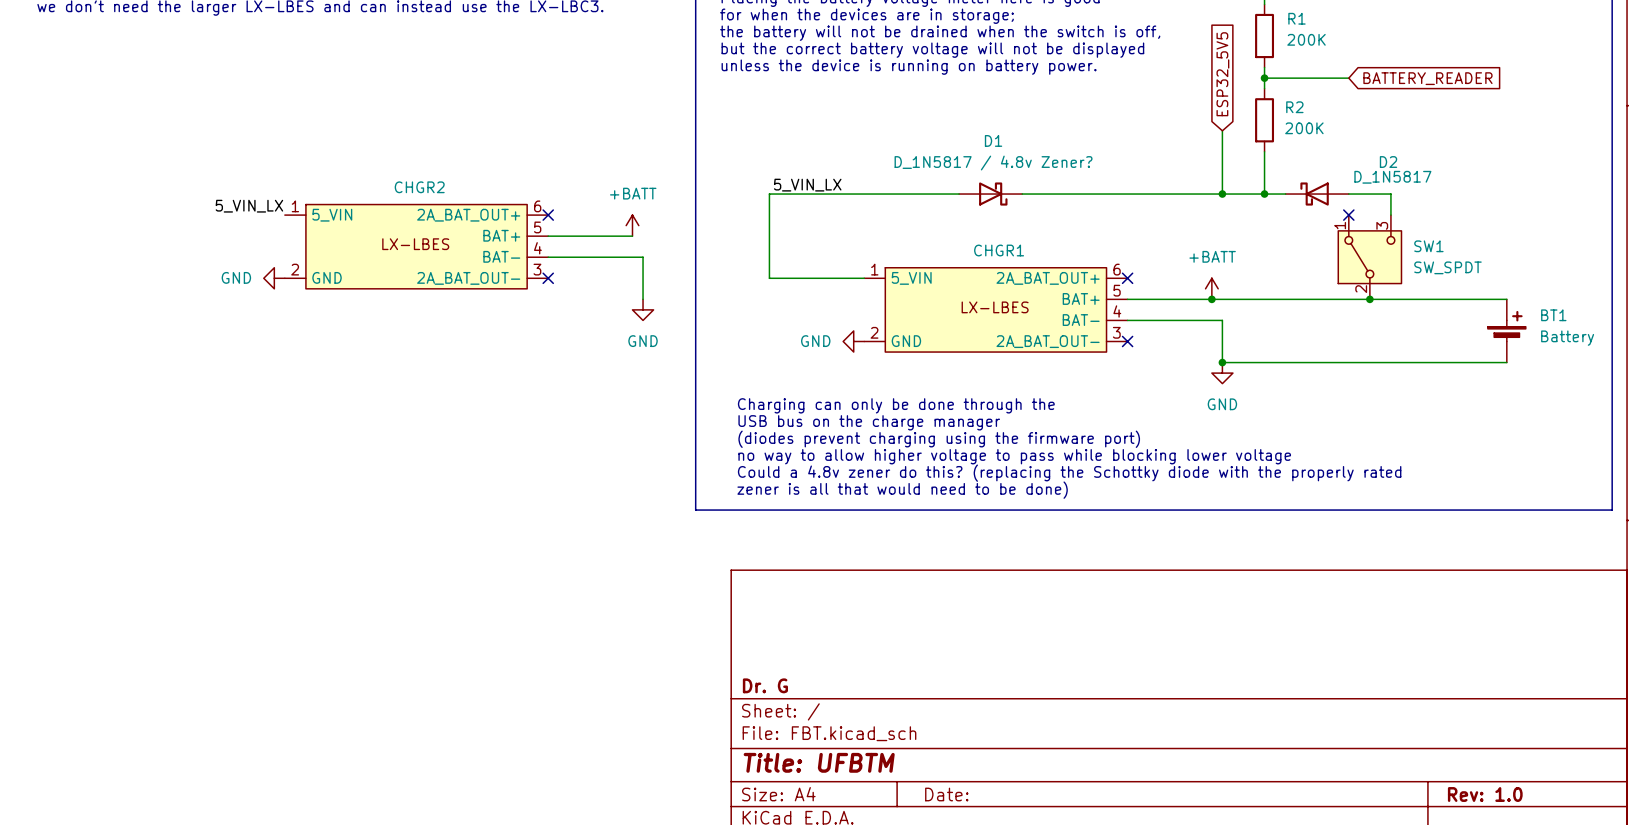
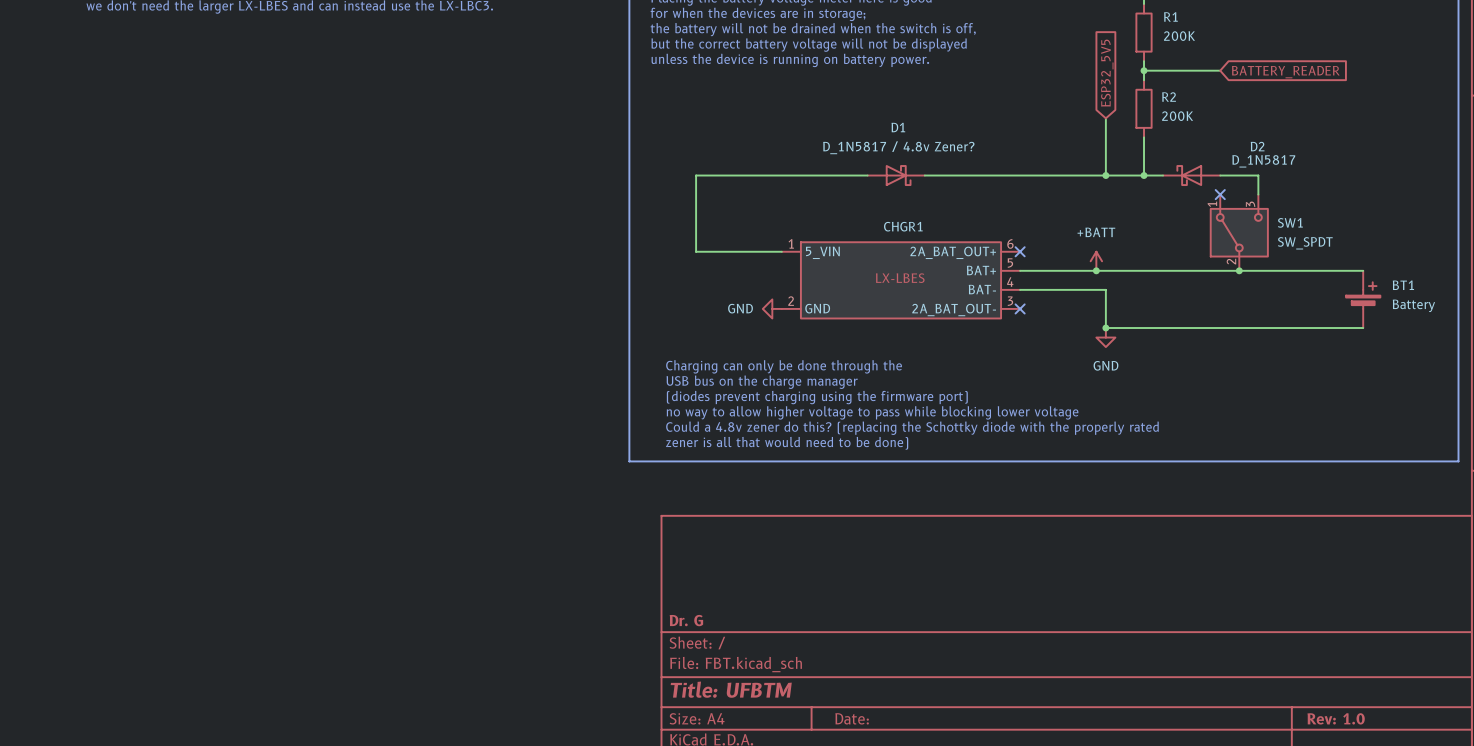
label: 5_VIN_LX (807, 185) -> none
label: 5_VIN_LX (249, 206) -> none
no-connect mark: (548, 215) -> none
power symbol: +BATT (632, 225) -> none
wire: (548, 236) (632, 236) -> none
CHGR2: (416, 246) -> none
wire: (548, 257) (643, 257) (643, 299) -> none
power symbol: GND (274, 278) -> none
no-connect mark: (548, 278) -> none
power symbol: GND (643, 309) -> none

